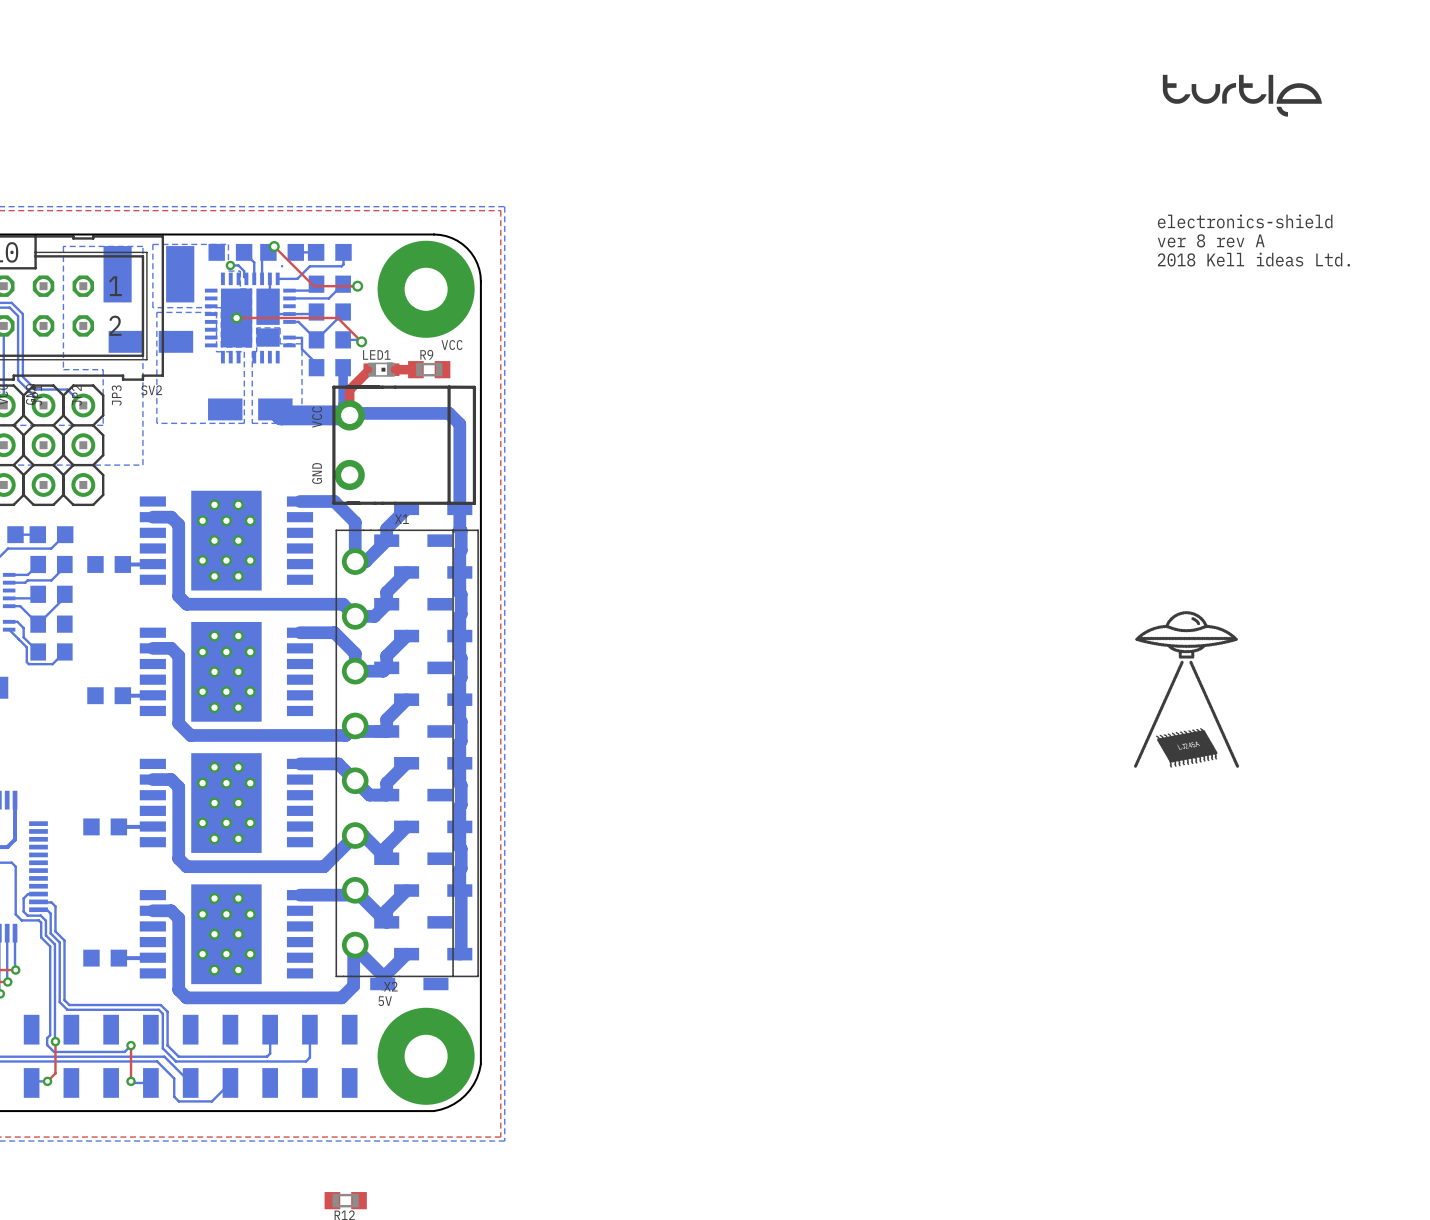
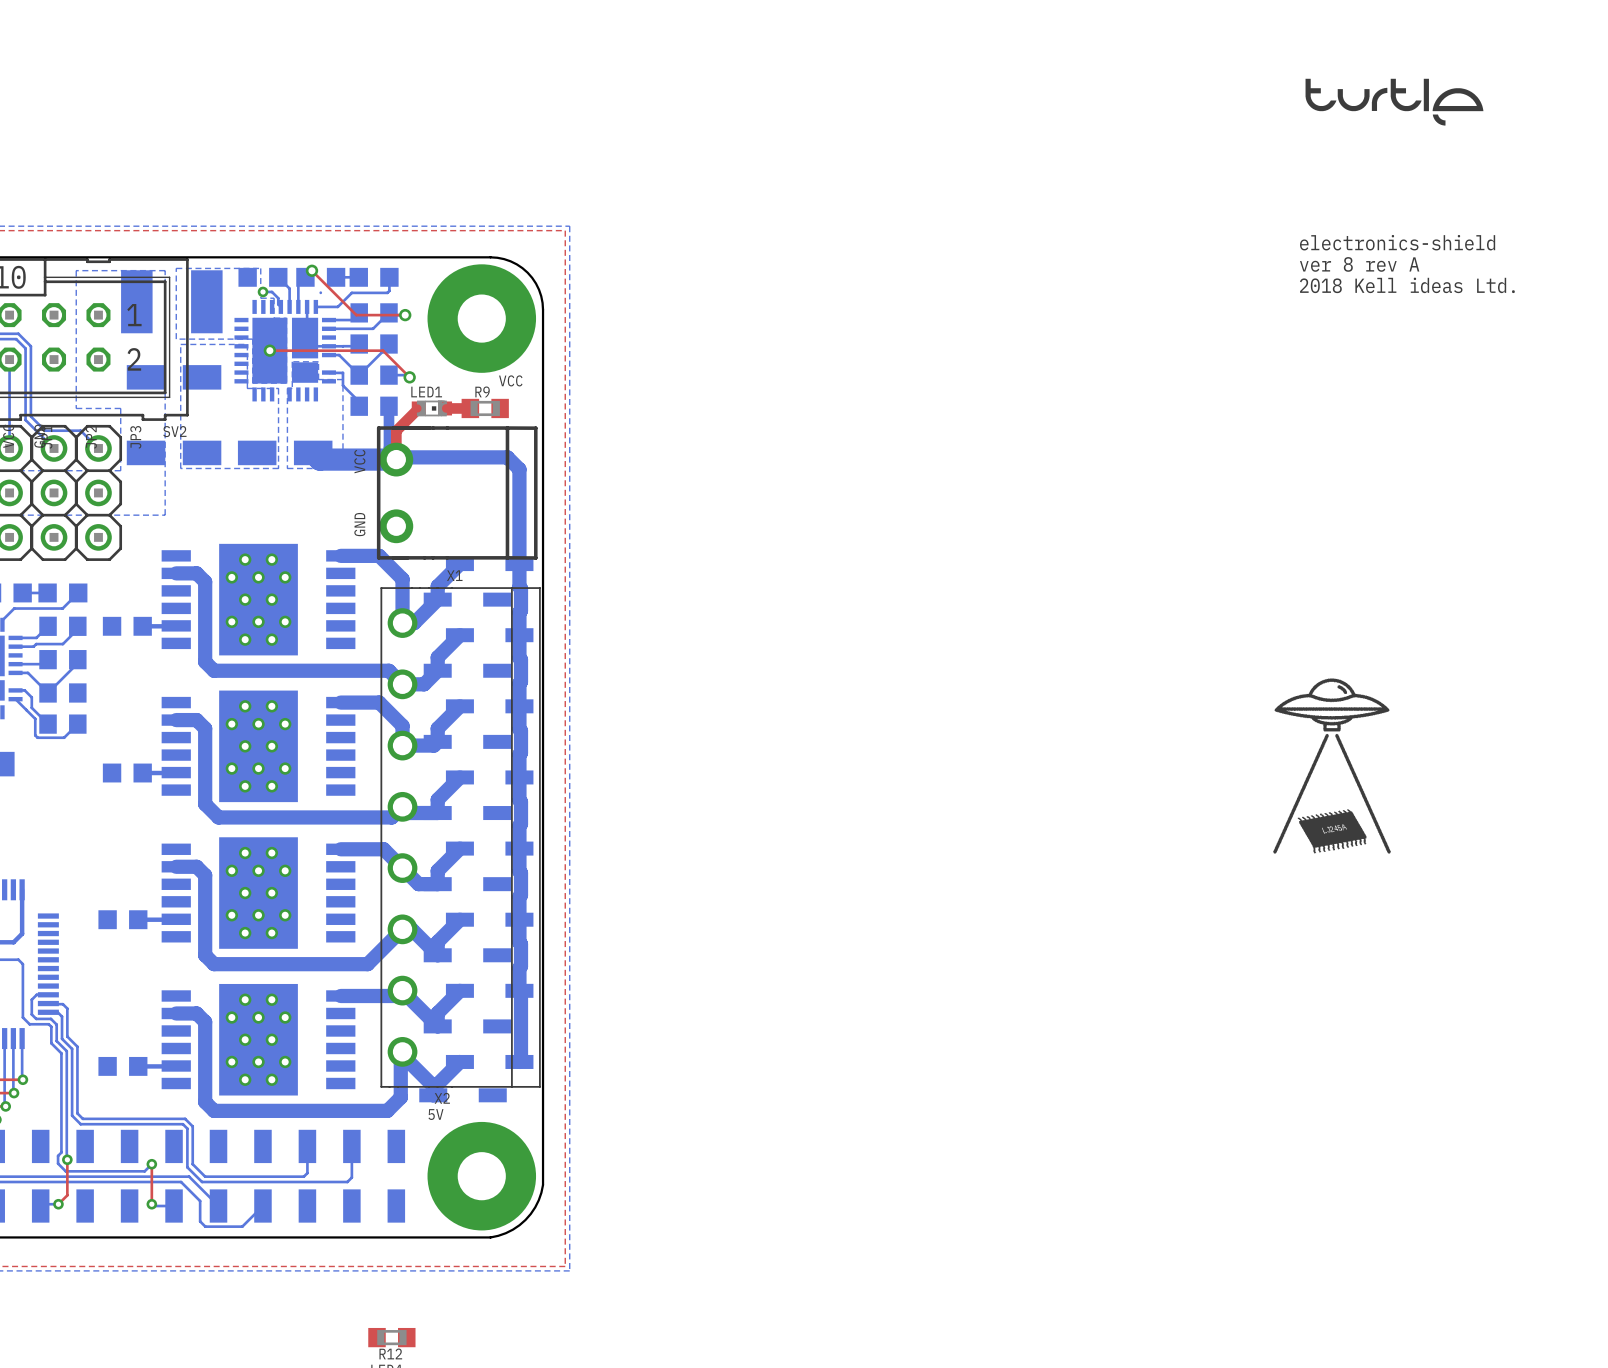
part: none -> (174, 452)

